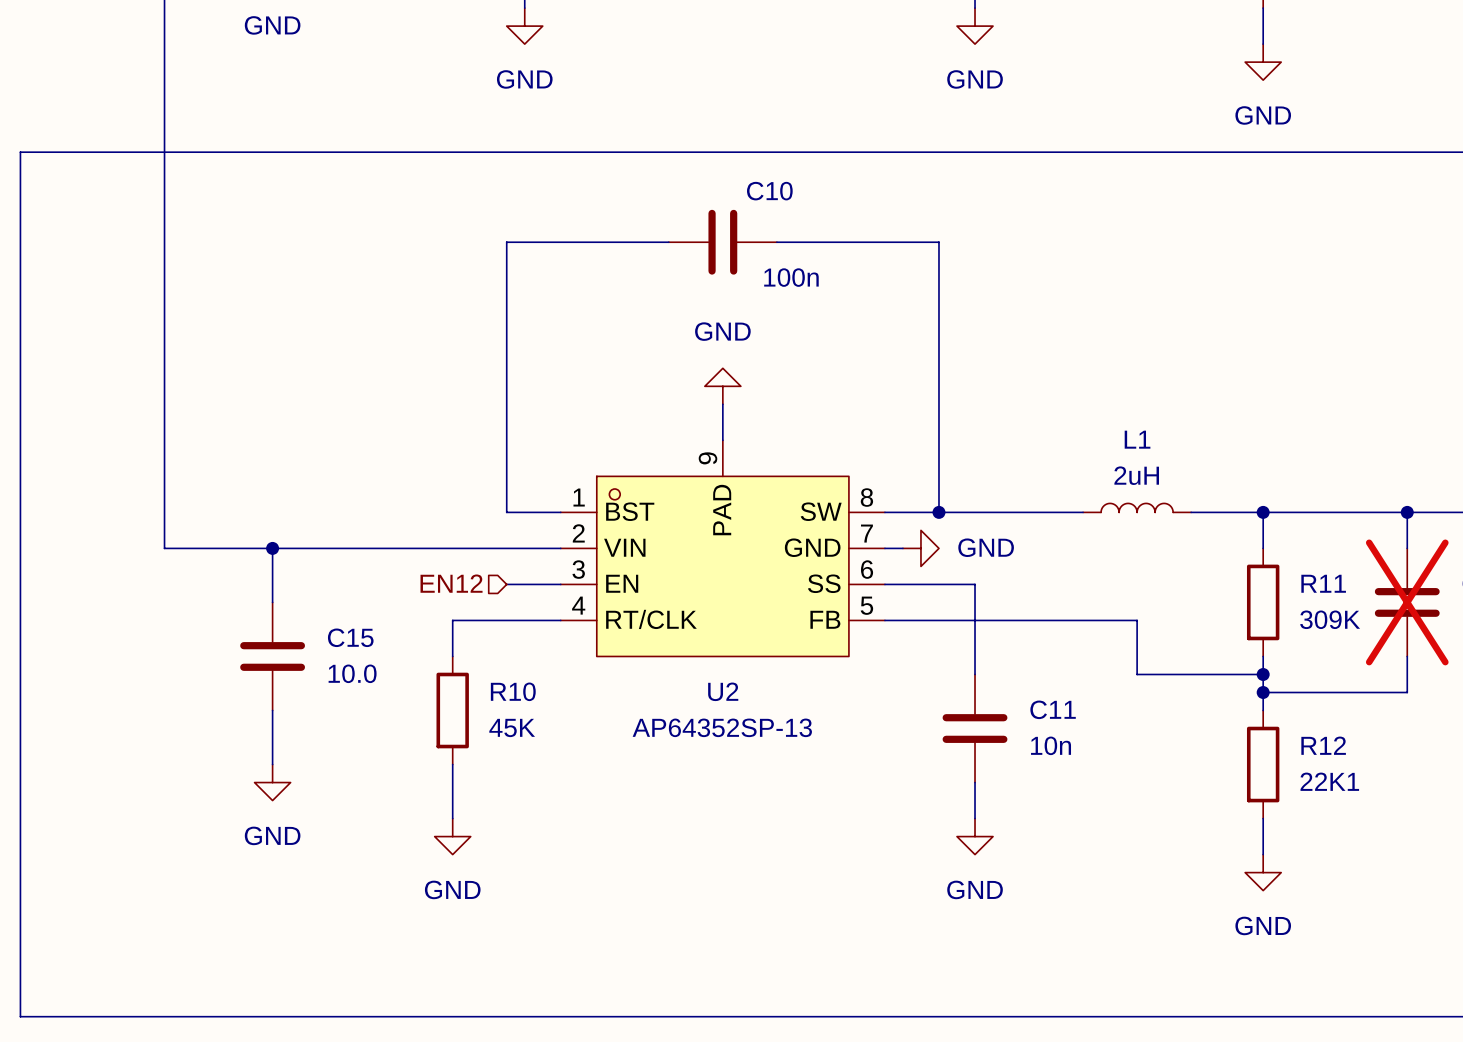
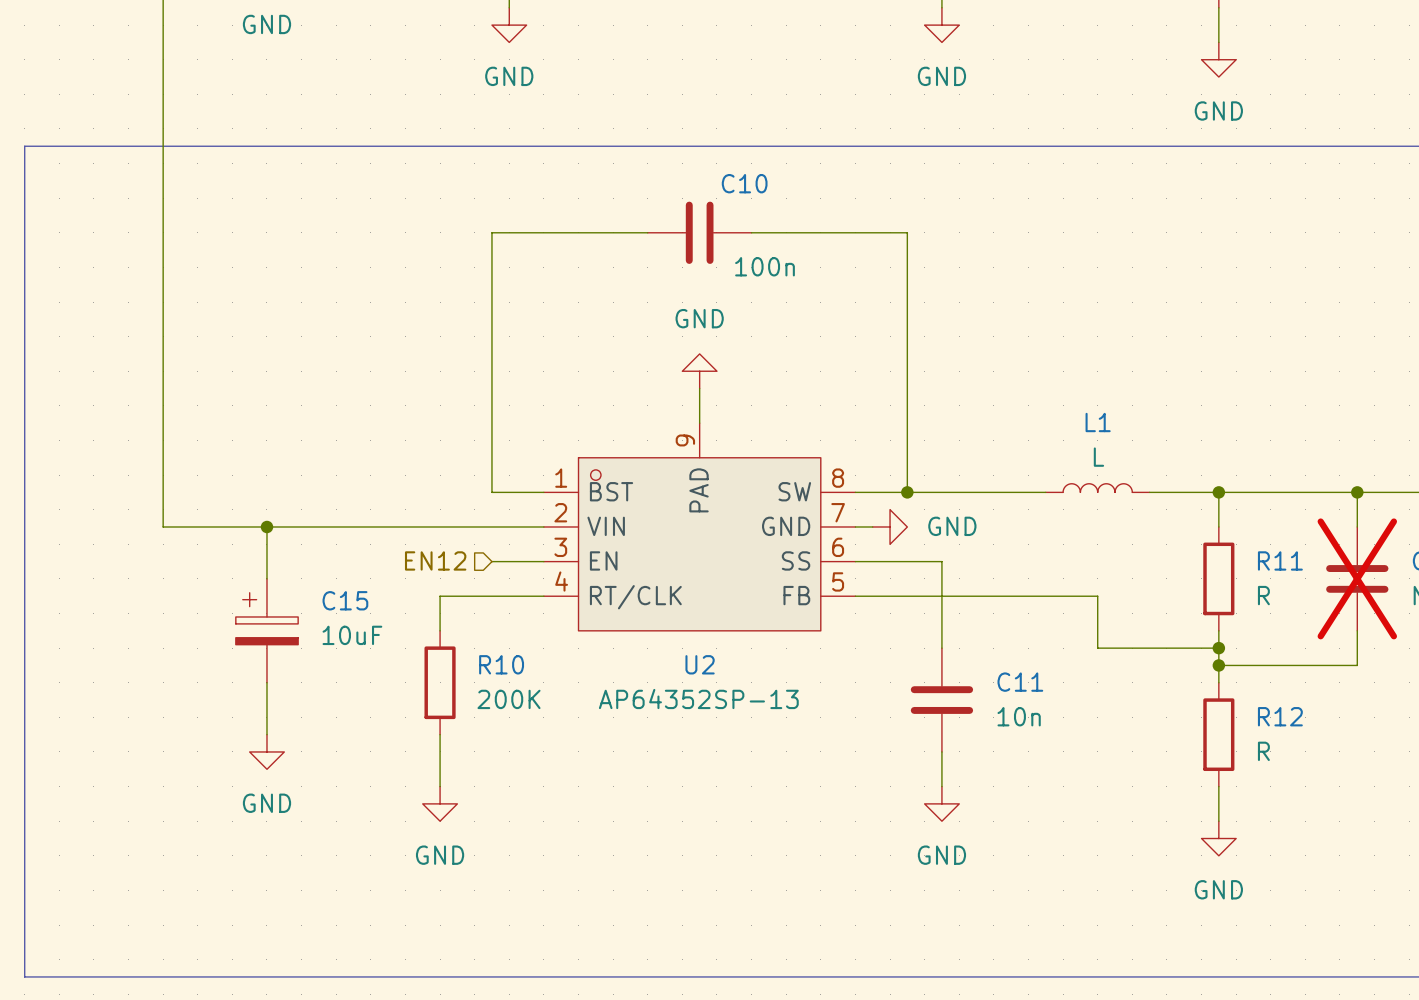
L1 value: 2uH (1136, 475) -> L (1098, 457)
C15 symbol: [240, 602, 306, 711] -> [235, 578, 299, 683]
R11 value: 309K (1330, 619) -> R (1263, 595)
C15 value: 10.0 (352, 673) -> 10uF (352, 635)
R10 value: 45K (512, 727) -> 200K (509, 699)
R12 value: 22K1 (1329, 781) -> R (1263, 751)

